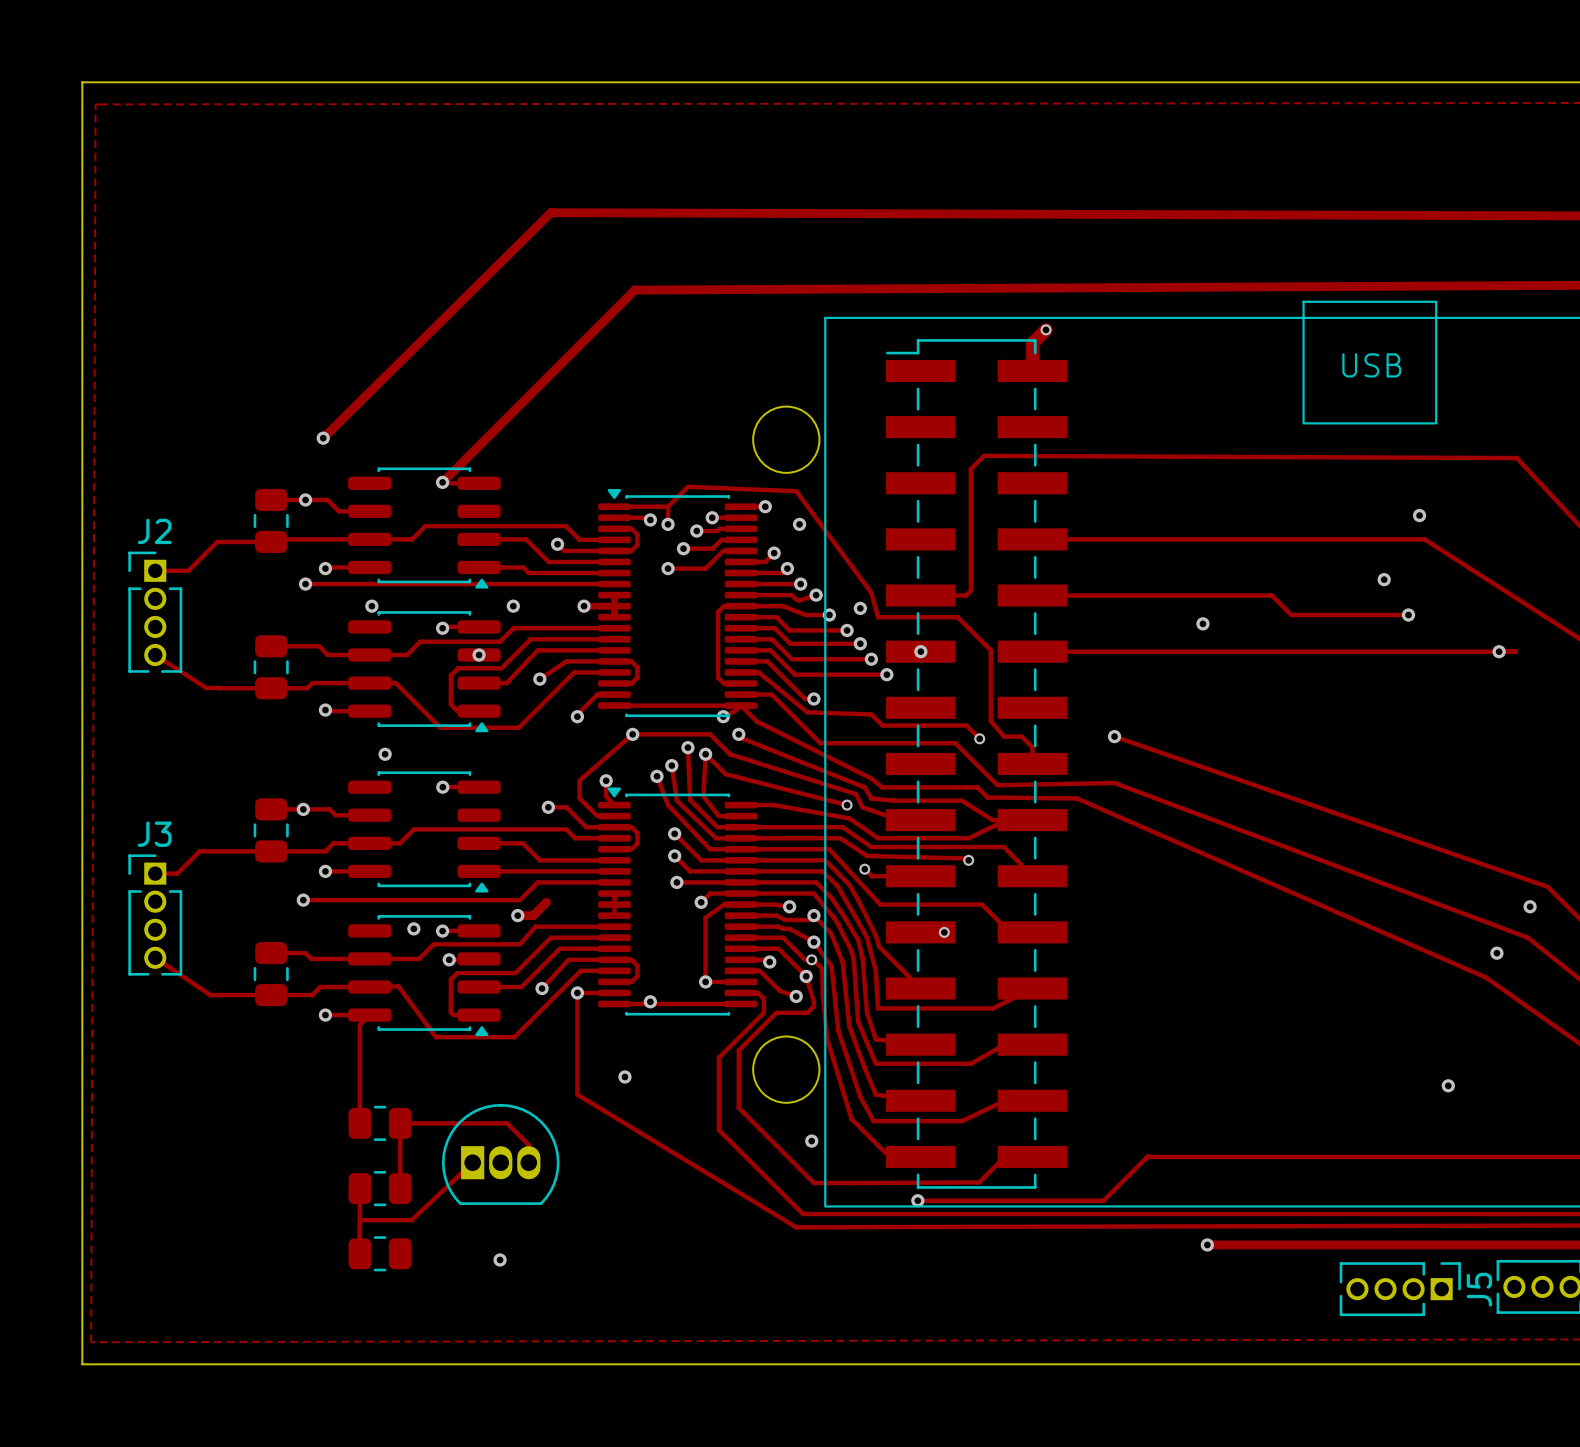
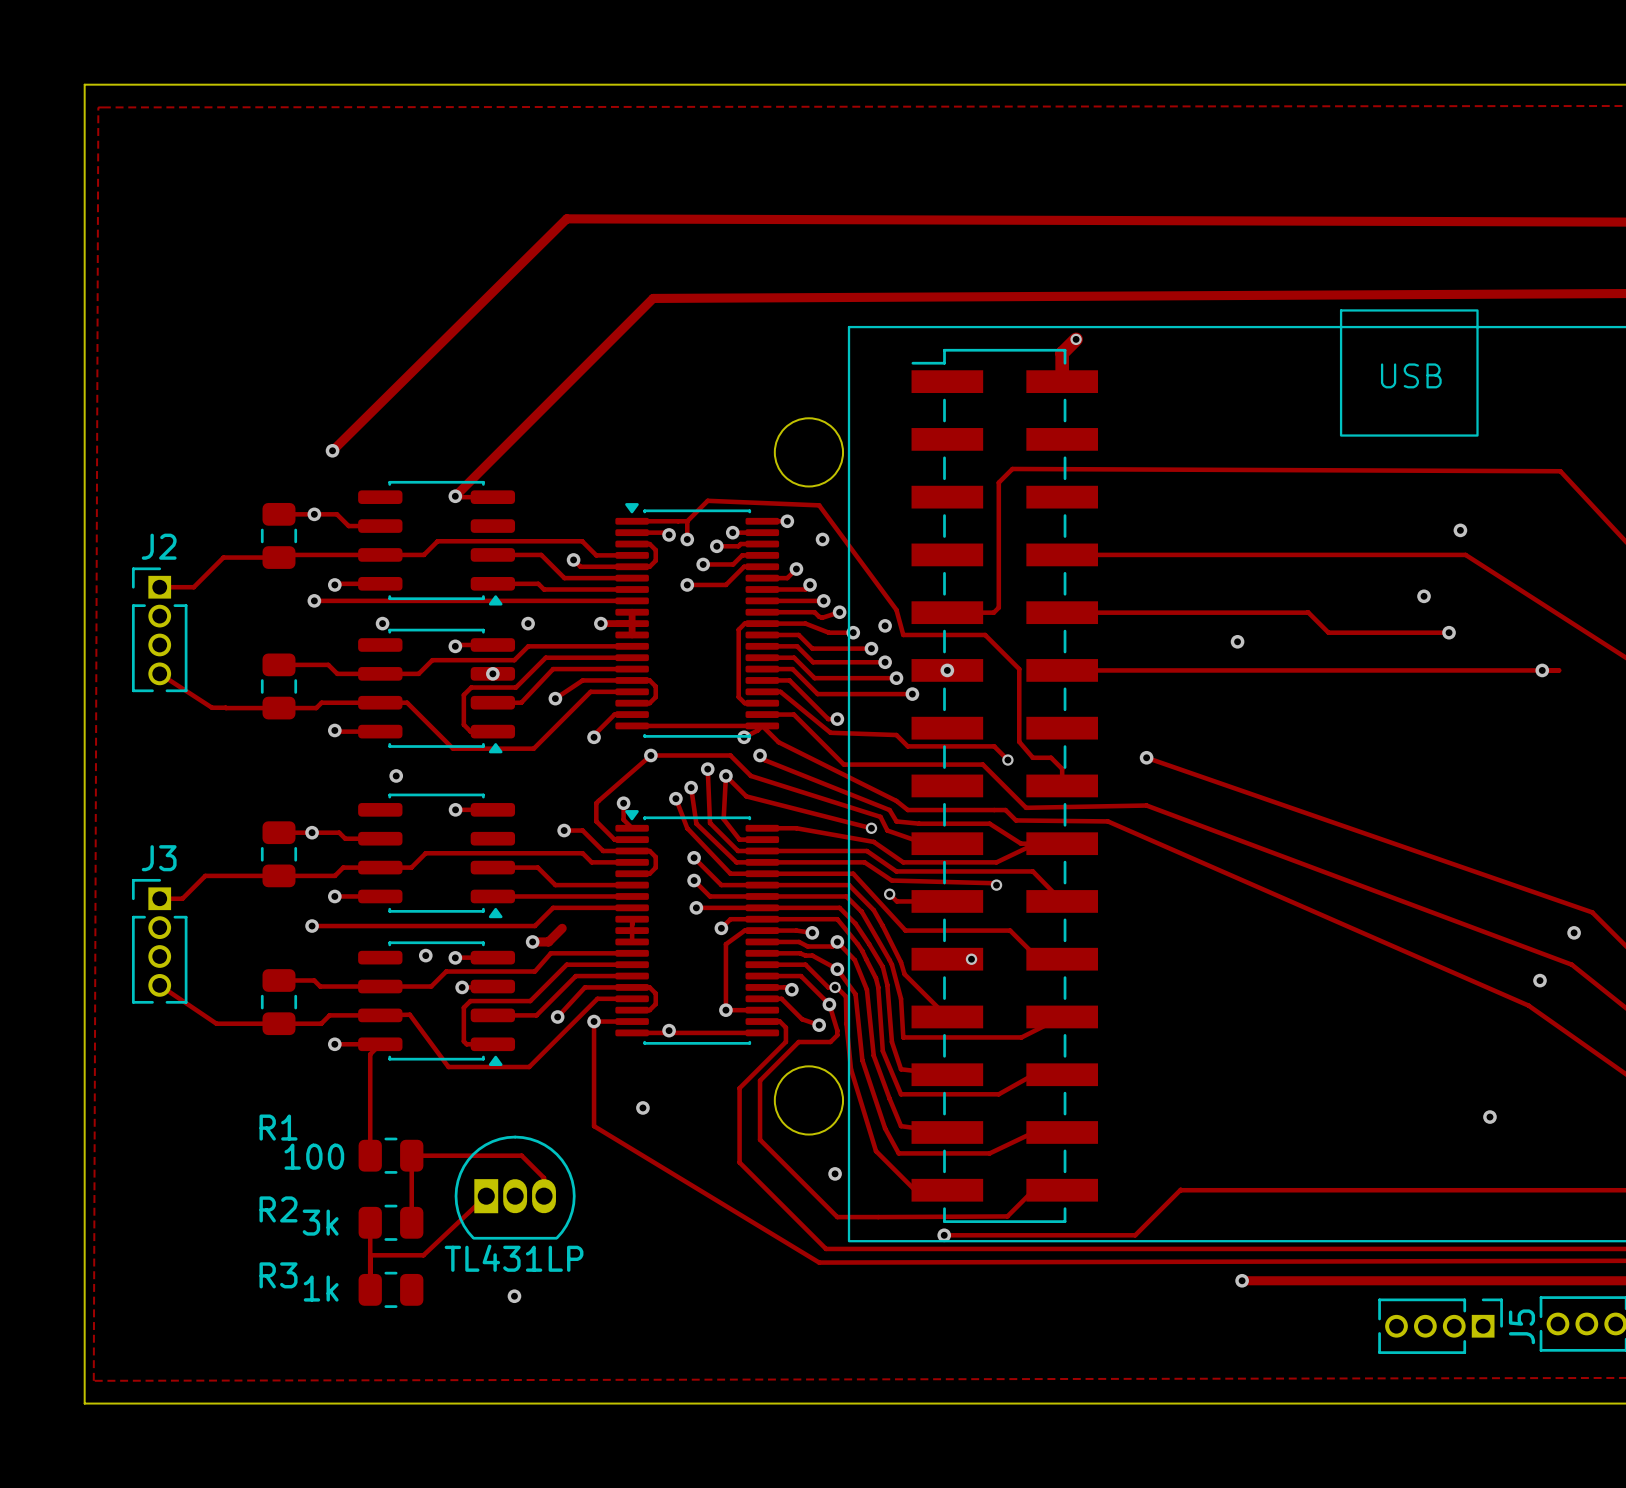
R1 name: none -> R1 (278, 1127)
R1 value: none -> 100 (314, 1156)
R2 name: none -> R2 (278, 1209)
R2 value: none -> 3k (320, 1222)
part value: none -> TL431LP (514, 1258)
R3 name: none -> R3 (278, 1275)
R3 value: none -> 1k (321, 1288)

